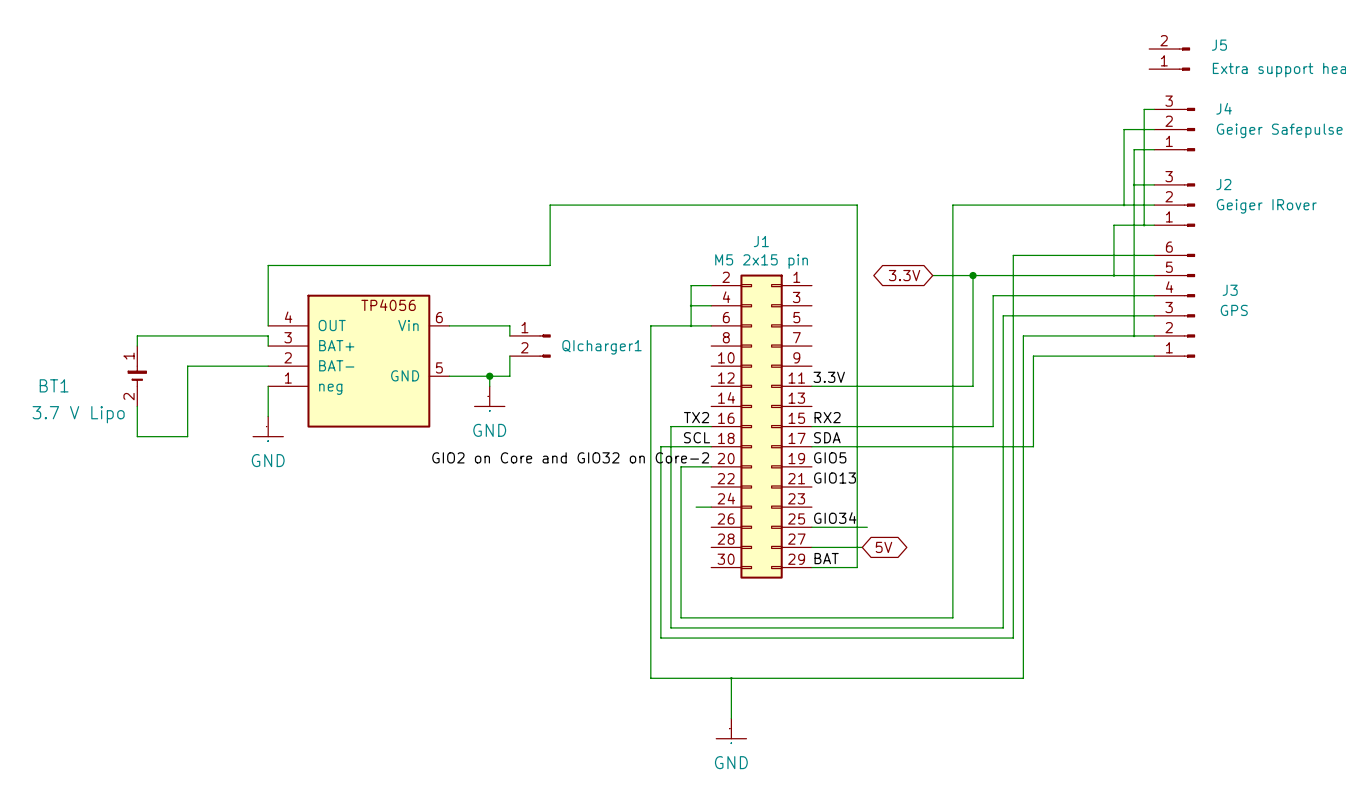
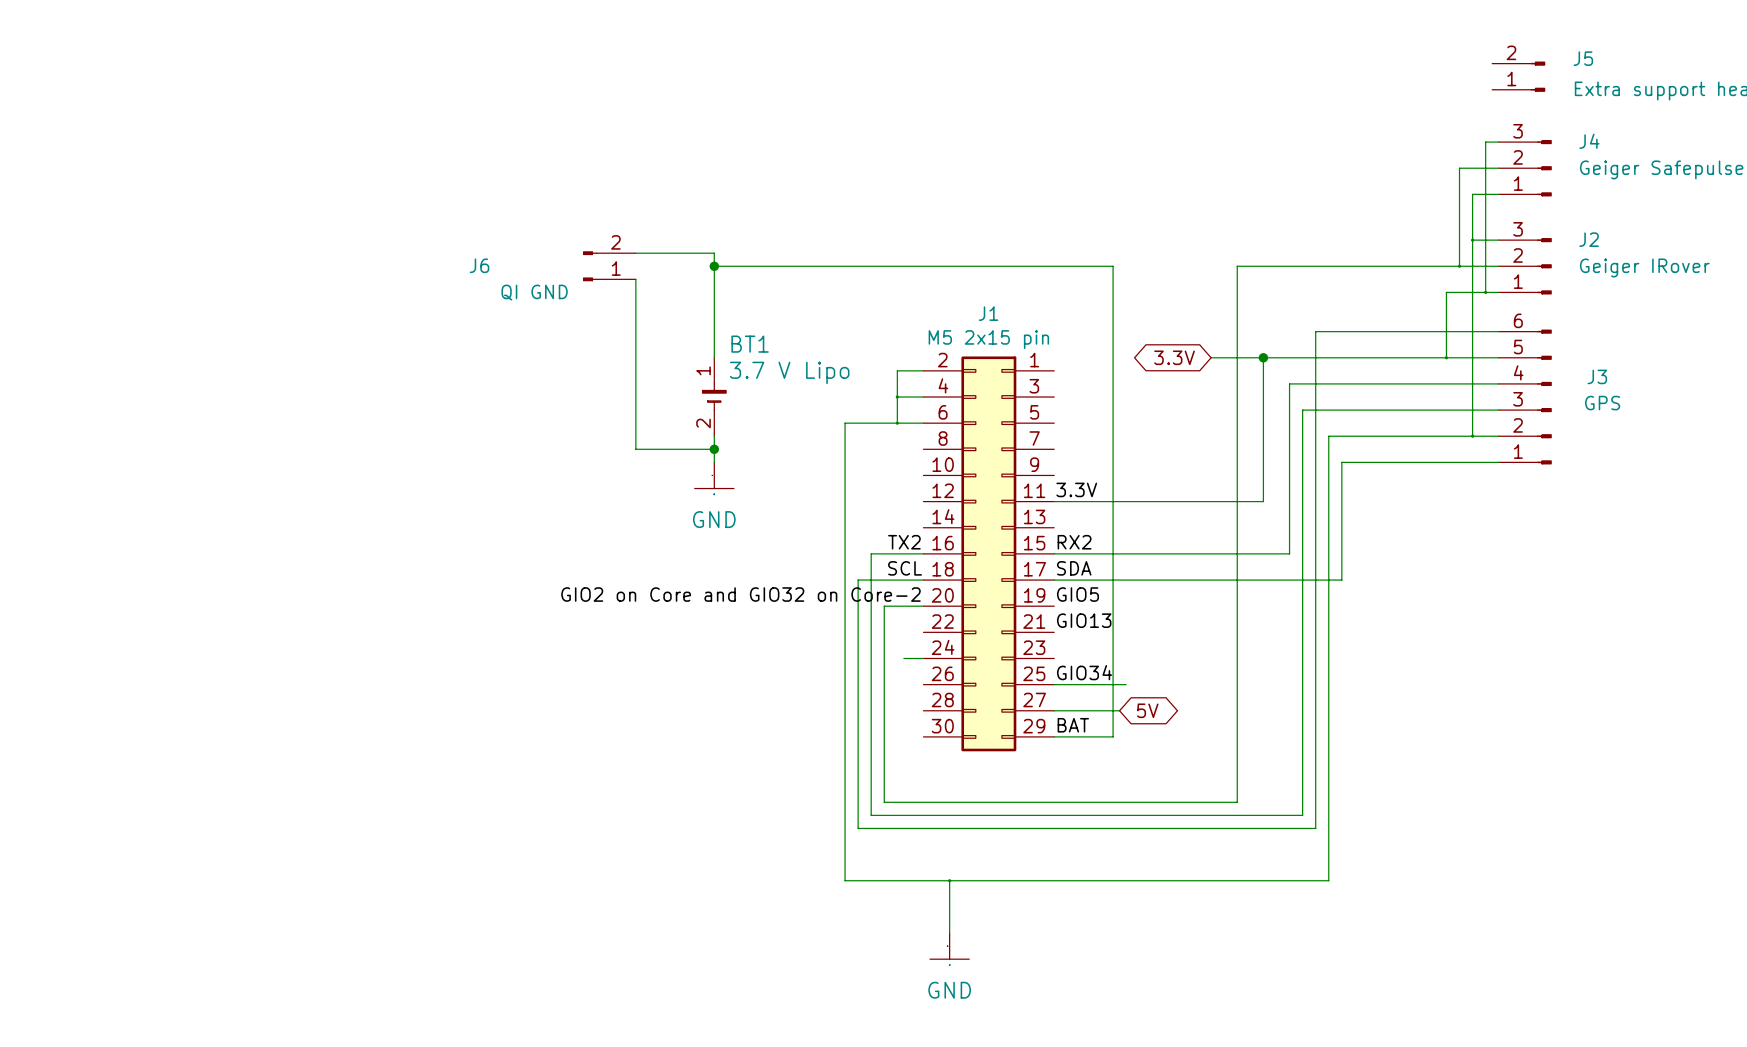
J6: none -> QI GND (609, 266)
junction: none -> (714, 266)
wire: none -> (635, 279) (635, 449) (714, 449)
wire: (550, 265) (268, 265) (268, 325) -> (714, 344) (714, 357)
wire: (449, 325) (509, 325) (509, 335) -> (635, 253) (714, 253) (714, 266)
wire: none -> (714, 436) (714, 462)
wire: (137, 346) (137, 335) (268, 335) (268, 346) -> none
QIcharger1: (529, 346) -> none
junction: none -> (714, 449)
wire: (509, 356) (509, 376) (449, 376) -> none
part: (358, 361) -> none
wire: (268, 366) (187, 366) (187, 436) (137, 436) (137, 406) -> none
BT1 position: (137, 376) -> (714, 397)
wire: (489, 376) (489, 386) -> none
junction: (489, 376) -> none
BT1 name position: BT1 (54, 385) -> BT1 (750, 344)
wire: (268, 386) (268, 416) -> none
power symbol position: GND (489, 396) -> GND (714, 475)
BT1 value position: 3.7 V Lipo (78, 414) -> 3.7 V Lipo (789, 372)
power symbol: GND (268, 426) -> none

